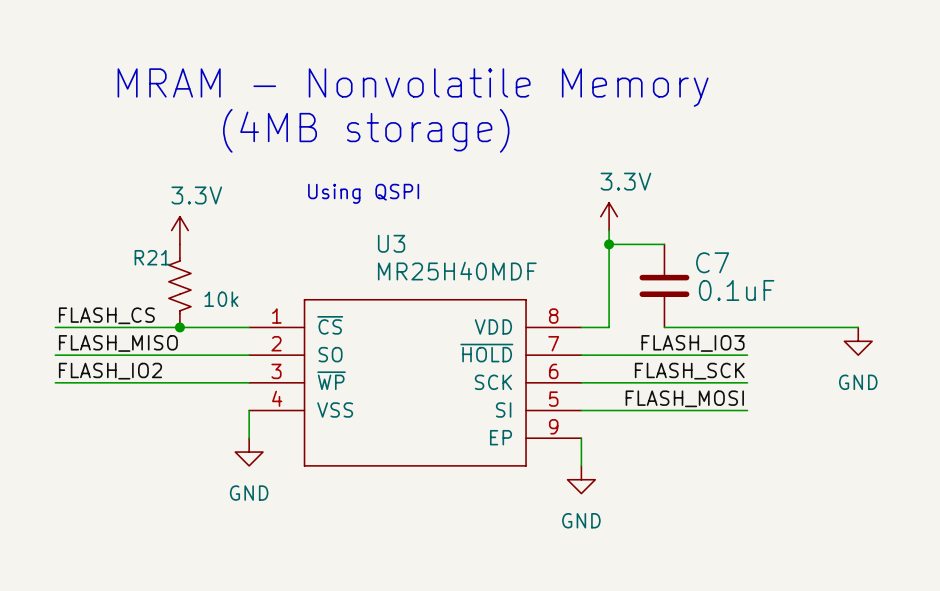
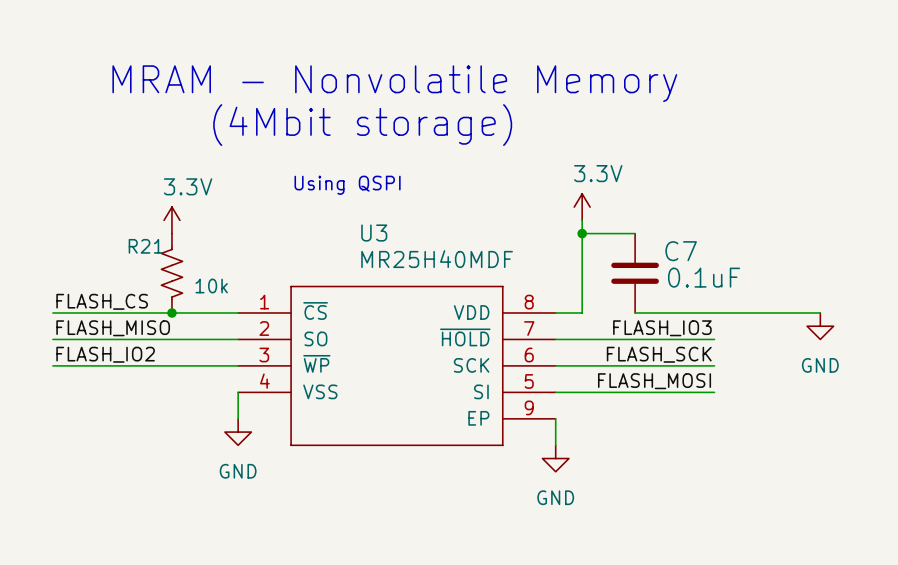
text: (4MB storage) (366, 130) -> (4Mbit storage) (362, 125)

